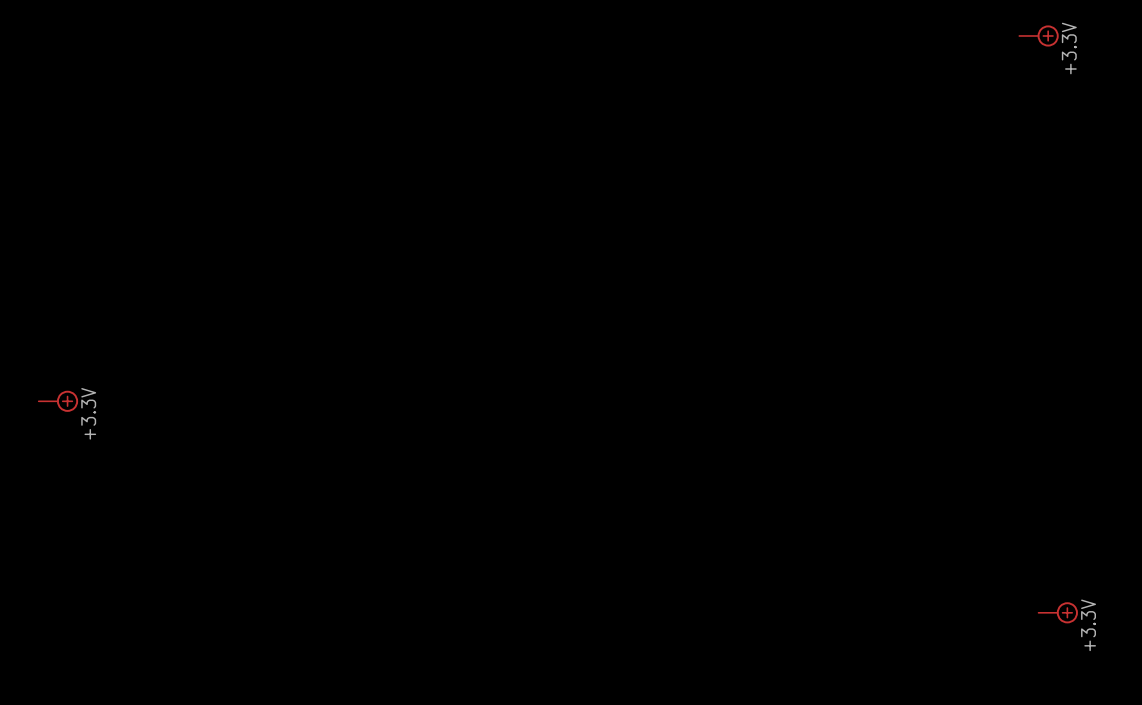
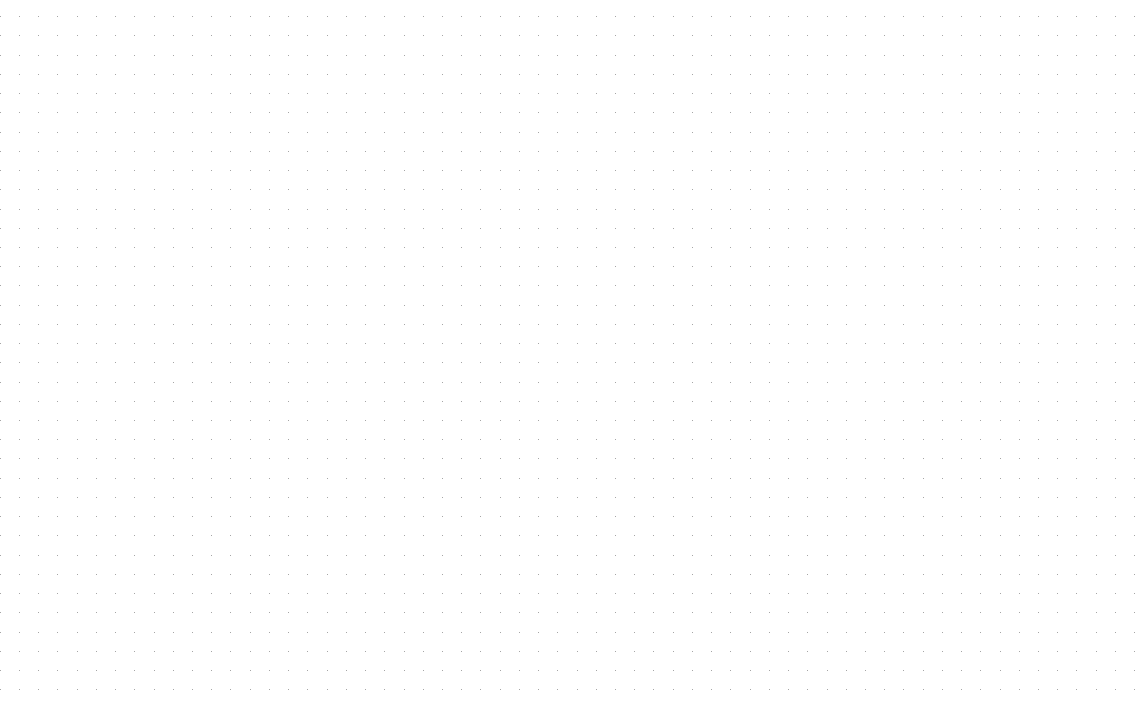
power symbol: +3.3V (1039, 35) -> none
power symbol: +3.3V (58, 401) -> none
power symbol: +3.3V (1058, 612) -> none

